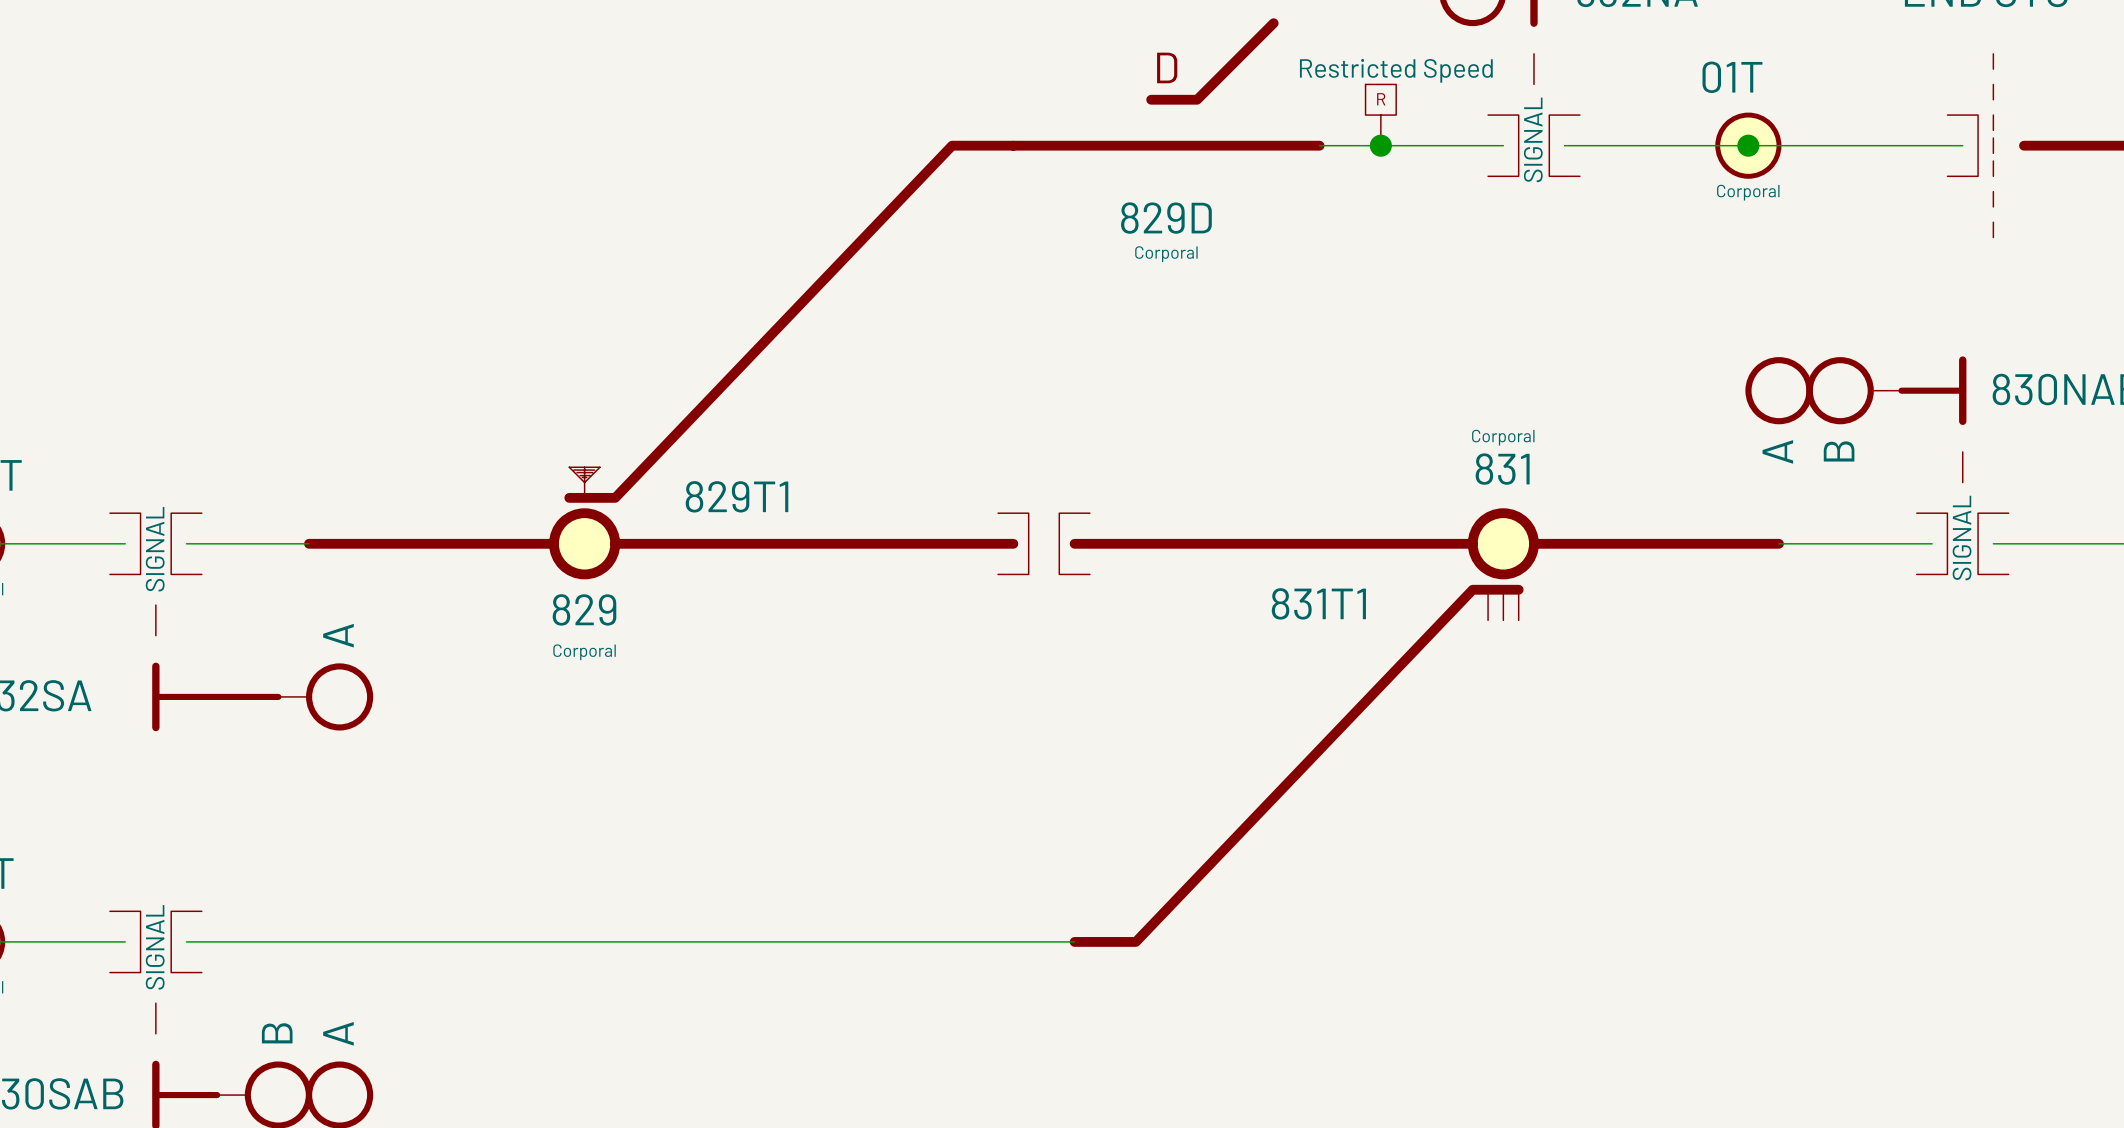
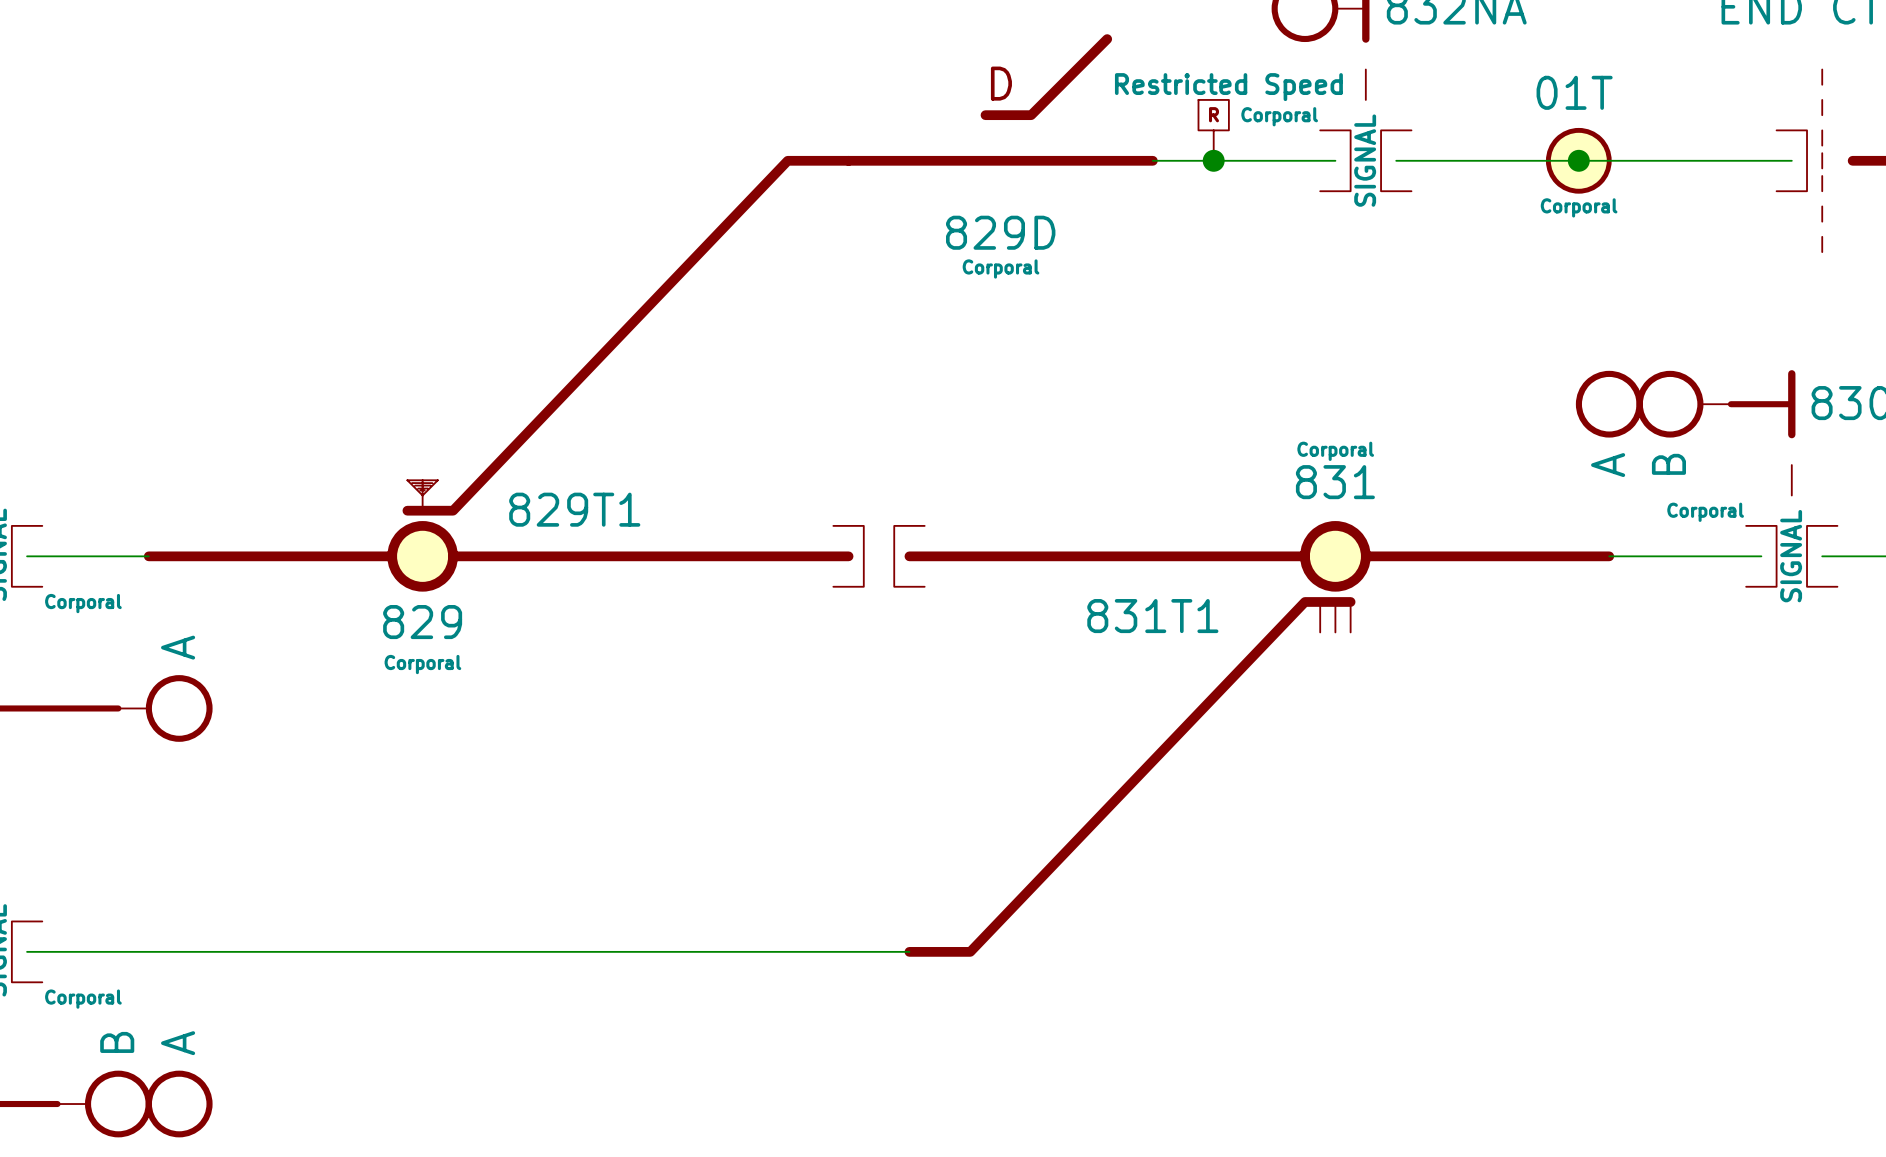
part text: none -> Corporal (1279, 116)
part text: none -> Corporal (1705, 512)
part text: none -> Corporal (83, 603)
part text: none -> Corporal (83, 999)

